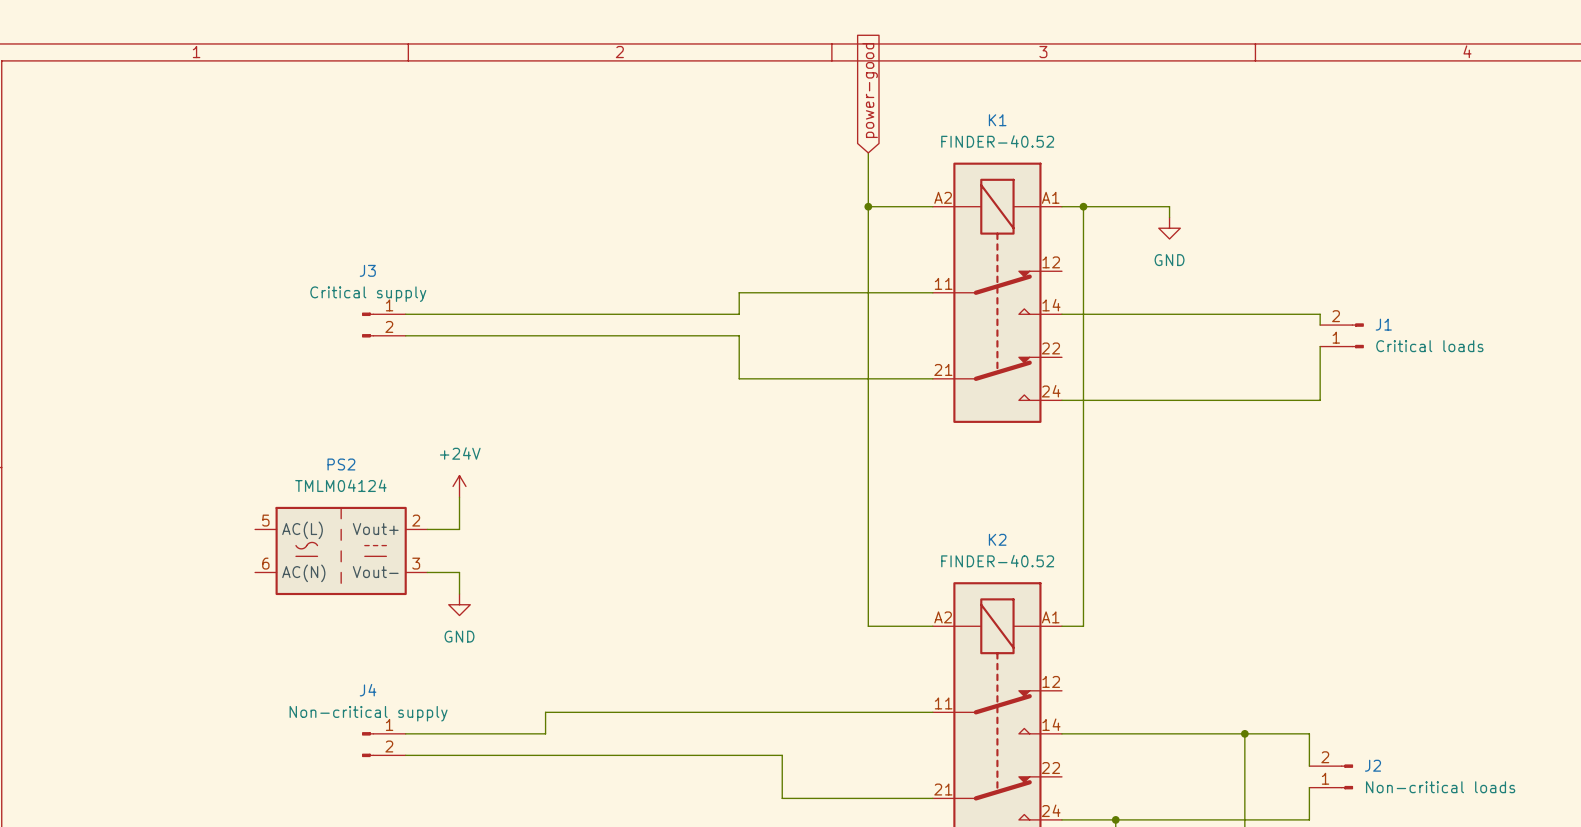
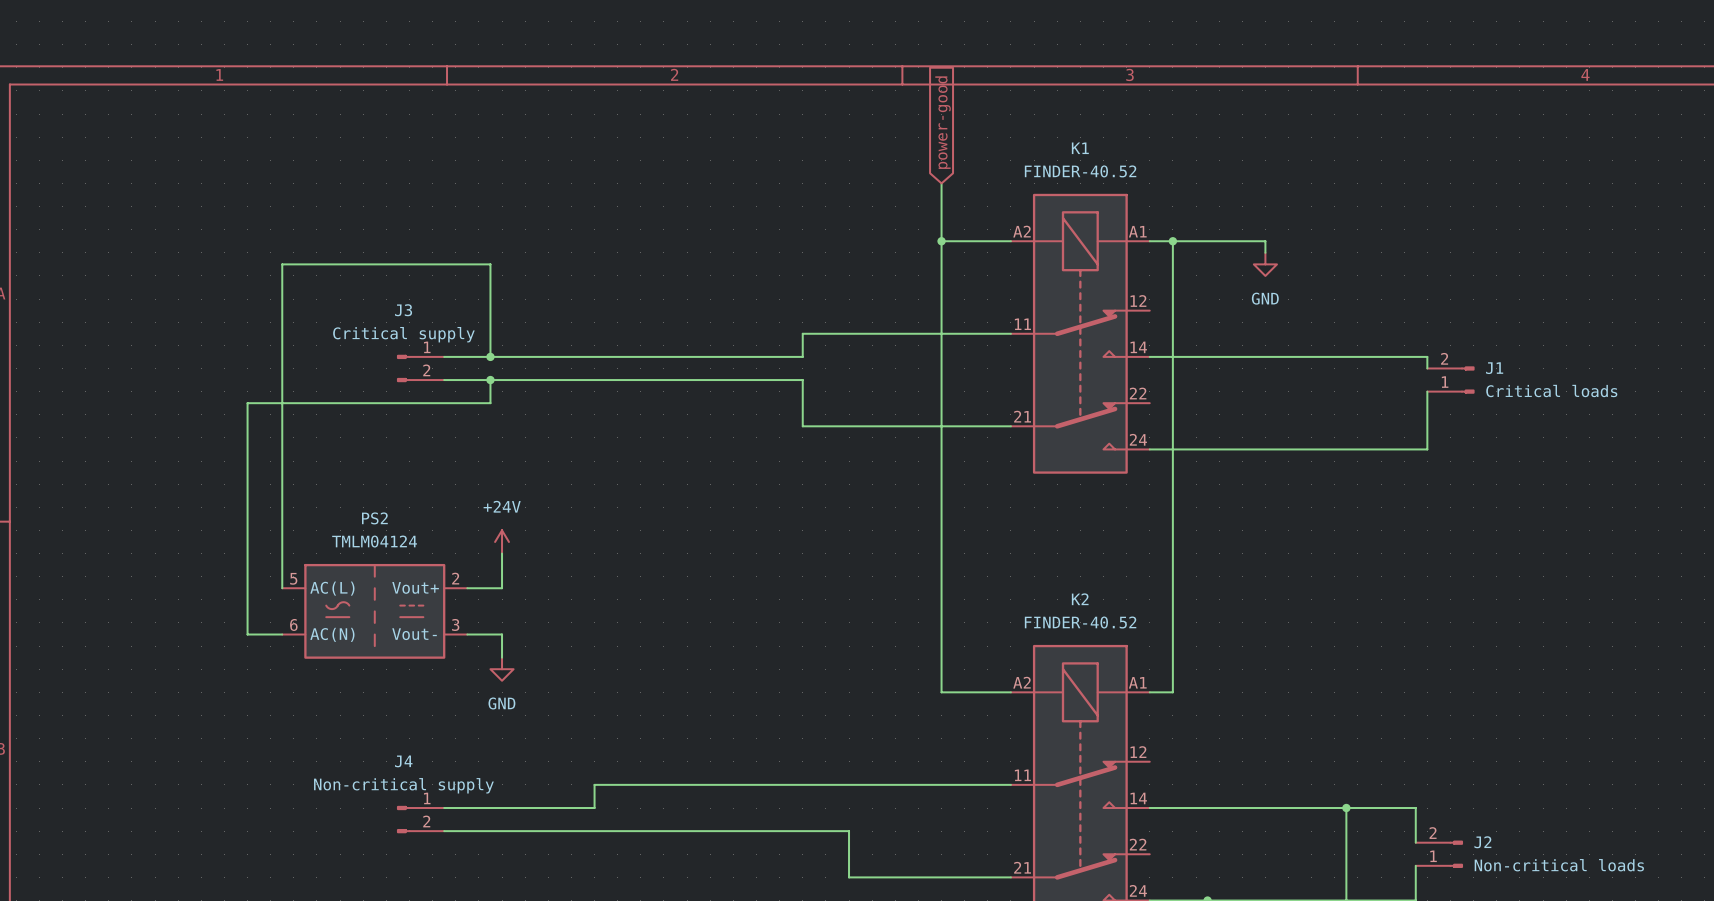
wire: none -> (490, 356) (490, 264) (282, 264) (282, 588)
junction: none -> (490, 356)
wire: none -> (490, 380) (490, 403) (247, 403) (247, 634) (282, 634)
junction: none -> (490, 380)

